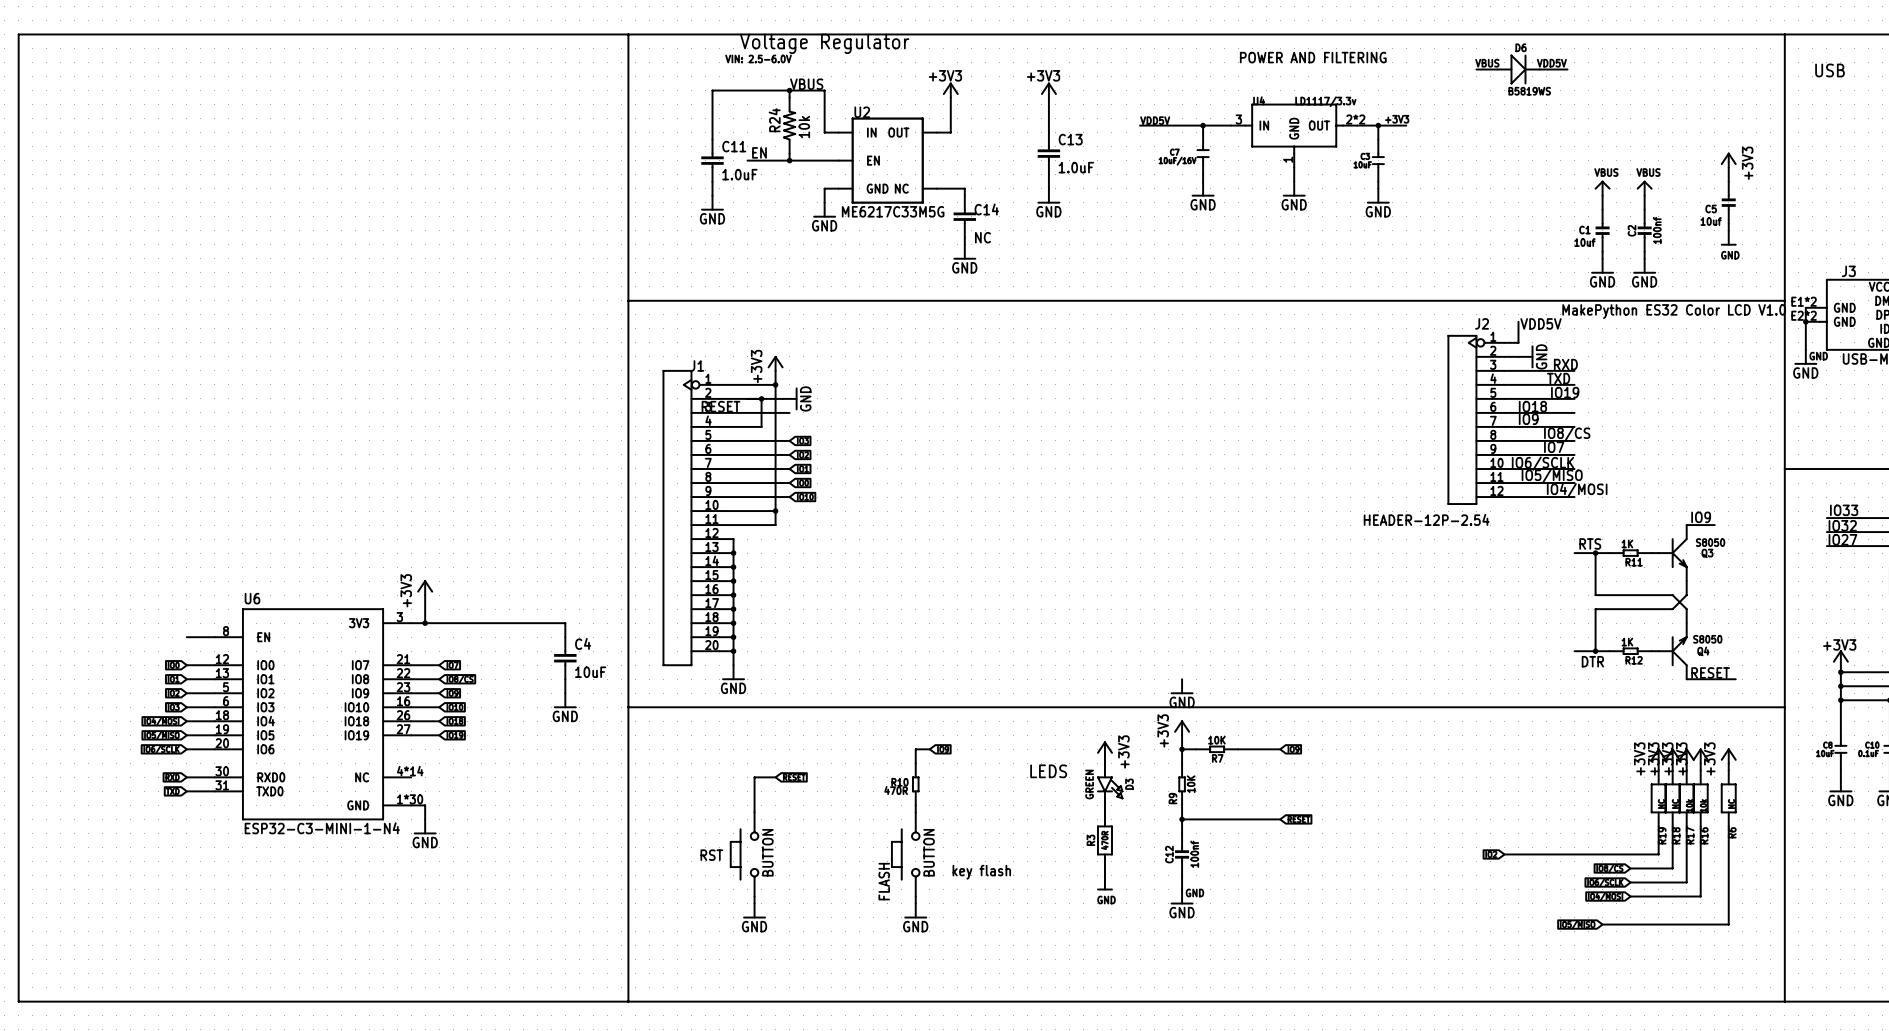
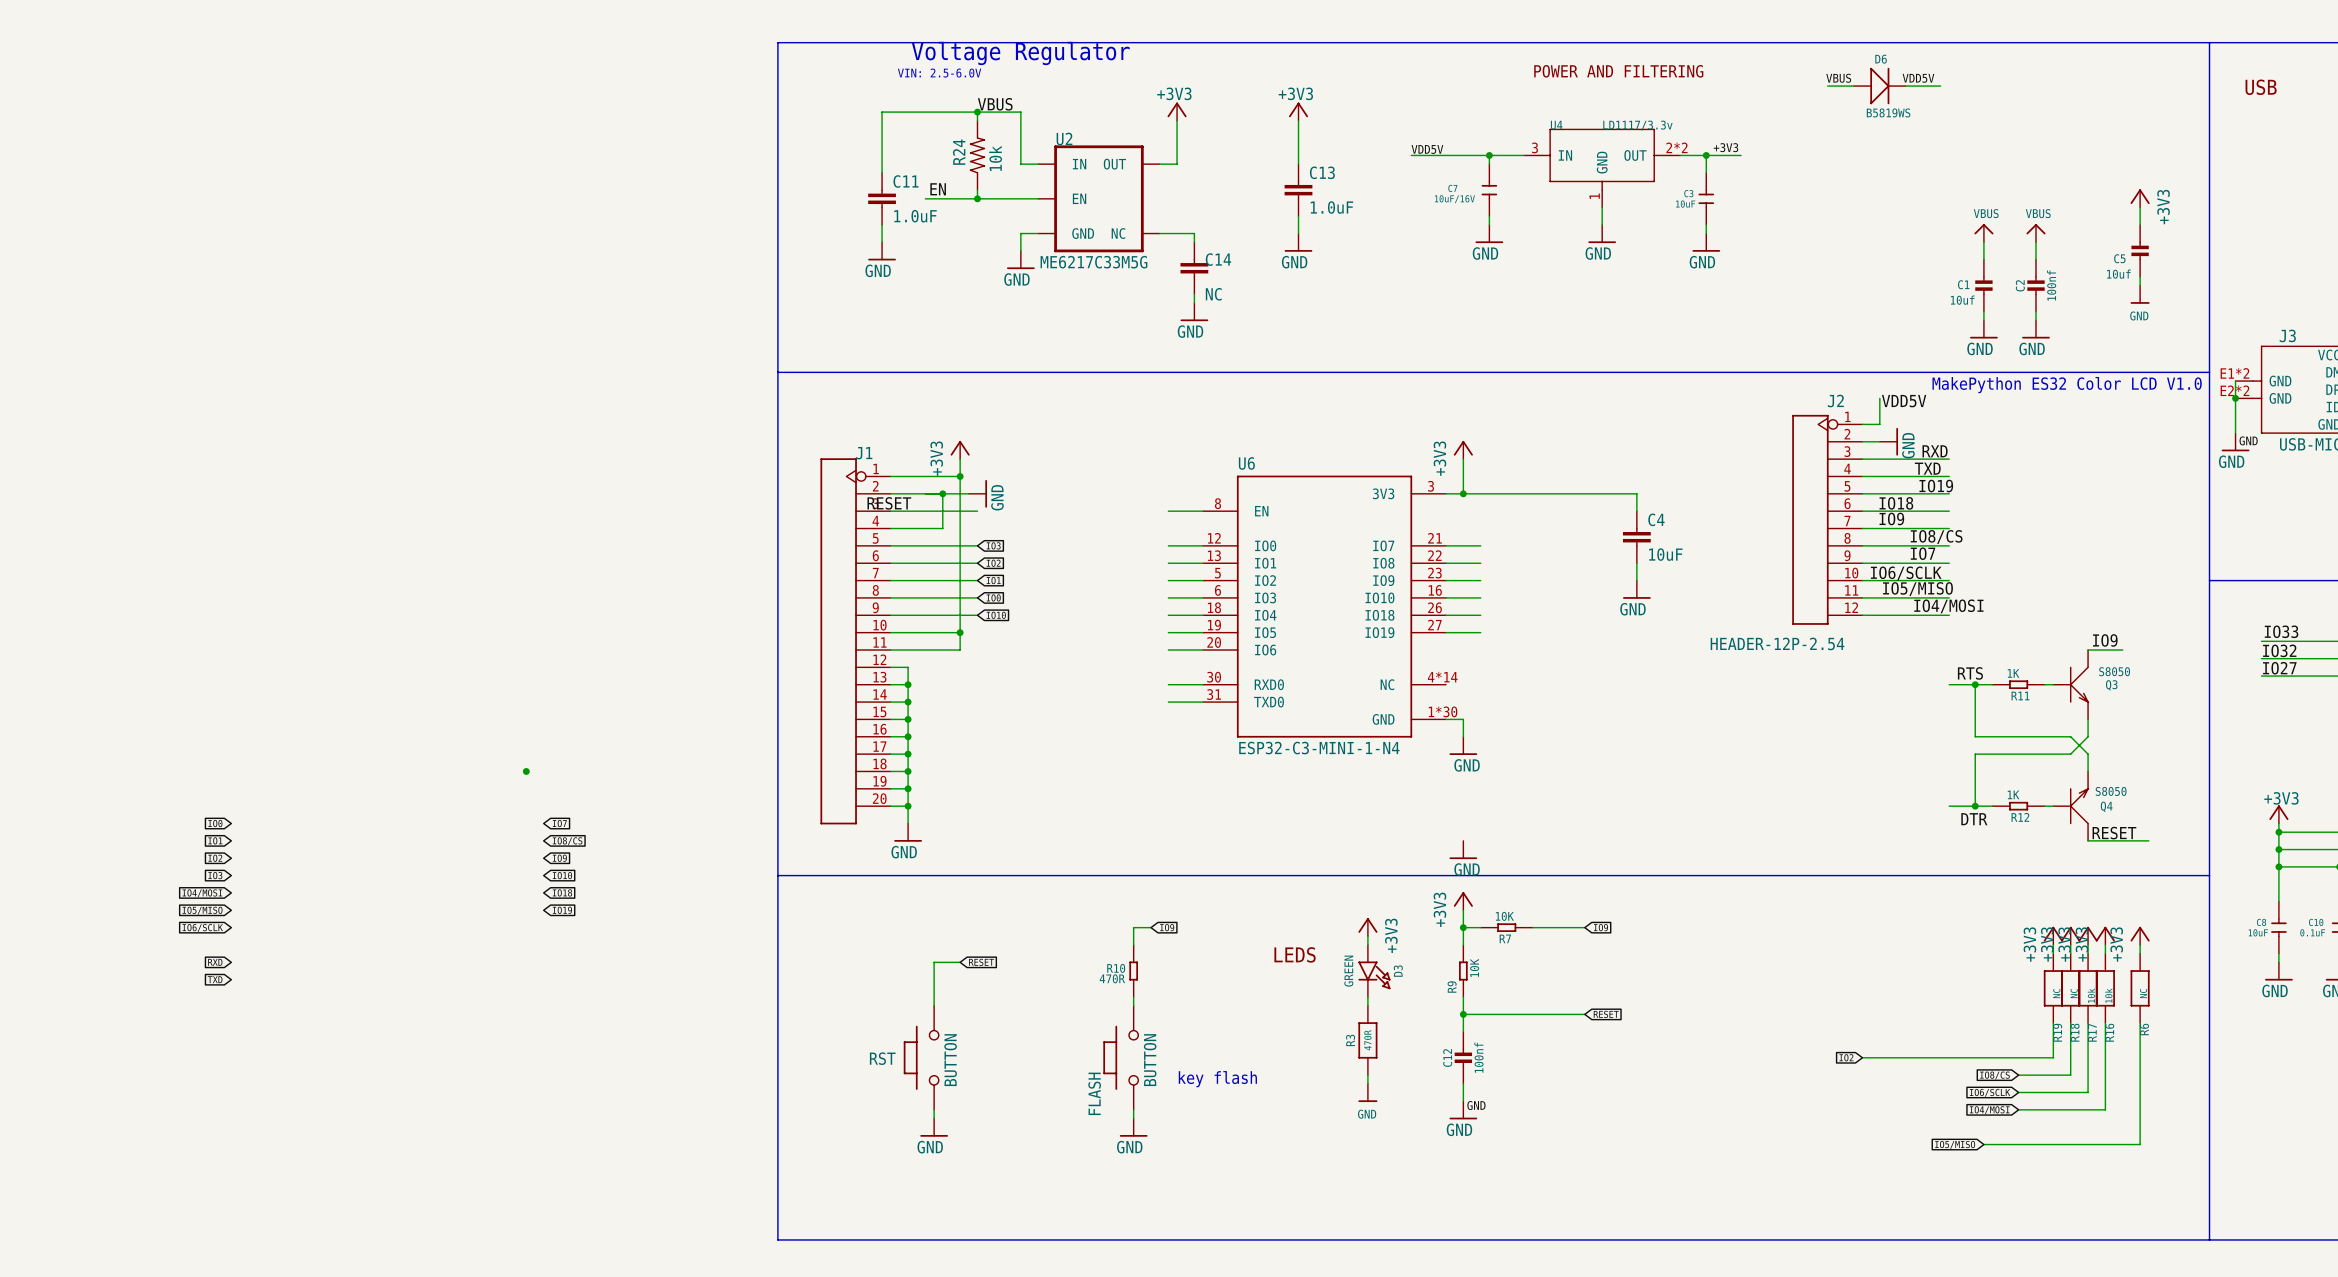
line: (628, 34) (18, 34) (18, 1001) (628, 1001) -> none
power symbol: none -> +3V3 (1463, 450)
wire: none -> (1463, 459) (1463, 493)
wire: none -> (1446, 493) (1636, 493) (1636, 511)
junction: none -> (1463, 493)
wire: none -> (1168, 511) (1203, 511)
wire: none -> (1168, 545) (1203, 545)
wire: none -> (1446, 545) (1480, 545)
wire: none -> (1168, 563) (1203, 563)
wire: none -> (1446, 563) (1480, 563)
wire: none -> (1636, 563) (1636, 580)
wire: none -> (1168, 580) (1203, 580)
wire: none -> (1446, 580) (1480, 580)
power symbol: none -> GND (1636, 589)
wire: none -> (1168, 597) (1203, 597)
wire: none -> (1446, 597) (1480, 597)
wire: none -> (1168, 615) (1203, 615)
wire: none -> (1446, 615) (1480, 615)
wire: none -> (1168, 632) (1203, 632)
wire: none -> (1446, 632) (1480, 632)
wire: none -> (1168, 650) (1203, 650)
wire: none -> (1168, 684) (1203, 684)
wire: none -> (1168, 702) (1203, 702)
wire: none -> (1446, 719) (1463, 719) (1463, 736)
power symbol: +3V3 (425, 587) -> none
wire: (425, 595) (425, 623) -> none
power symbol: none -> GND (1463, 745)
wire: (411, 623) (565, 623) (565, 637) -> none
wire: (186, 637) (214, 637) -> none
C4 position: (565, 658) -> (1636, 537)
wire: (186, 665) (214, 665) -> none
wire: (411, 665) (439, 665) -> none
wire: (186, 679) (214, 679) -> none
wire: (411, 679) (439, 679) -> none
wire: (565, 679) (565, 693) -> none
wire: (186, 693) (214, 693) -> none
wire: (411, 693) (439, 693) -> none
power symbol: GND (565, 700) -> none
wire: (186, 707) (214, 707) -> none
wire: (411, 707) (439, 707) -> none
U6 position: (313, 714) -> (1324, 606)
wire: (186, 721) (214, 721) -> none
wire: (411, 721) (439, 721) -> none
wire: (186, 735) (214, 735) -> none
wire: (411, 735) (439, 735) -> none
wire: (186, 749) (214, 749) -> none
wire: (186, 777) (214, 777) -> none
wire: (186, 791) (214, 791) -> none
wire: (411, 805) (425, 805) (425, 819) -> none
power symbol: GND (425, 826) -> none

